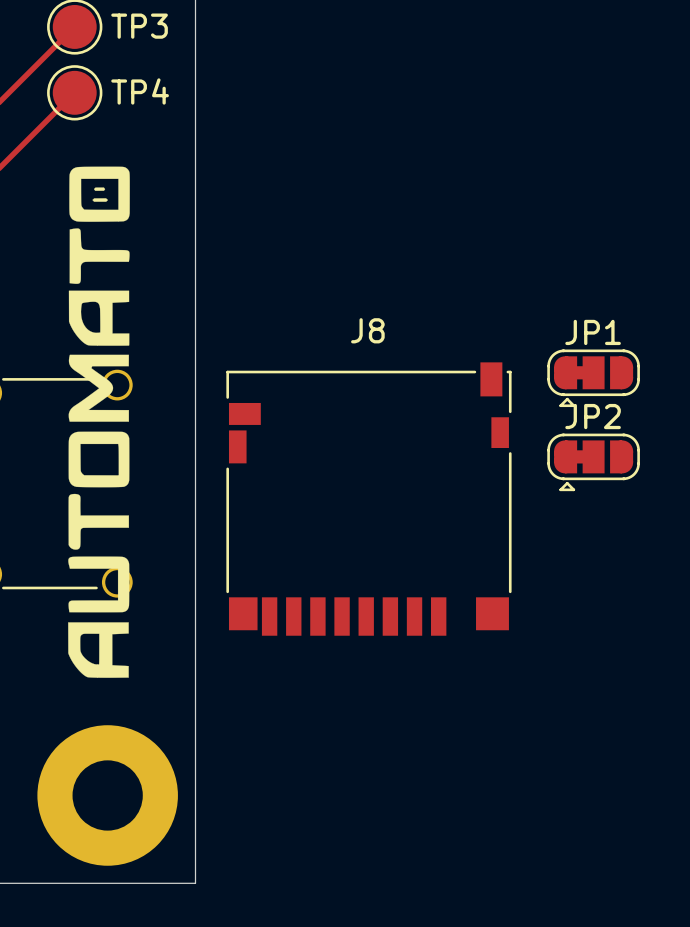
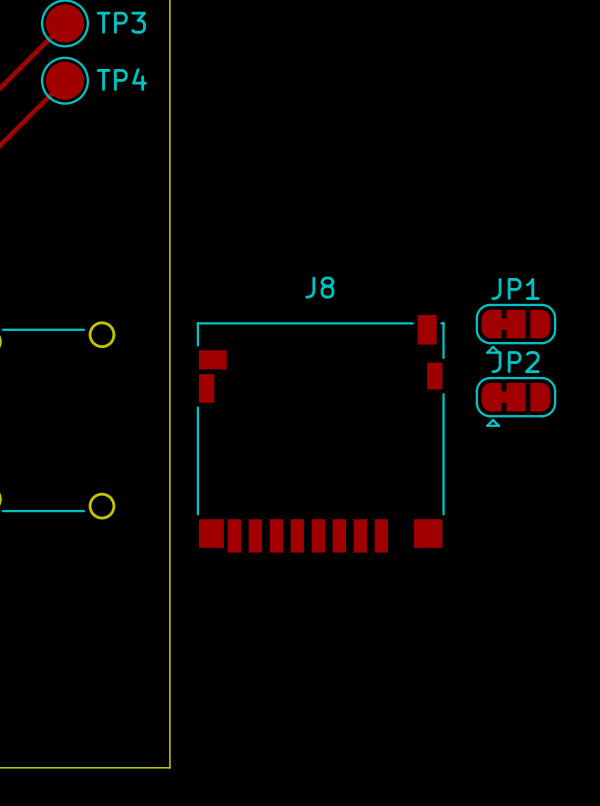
drawing: [68, 166, 130, 678] -> none
part: (107, 795) -> none

